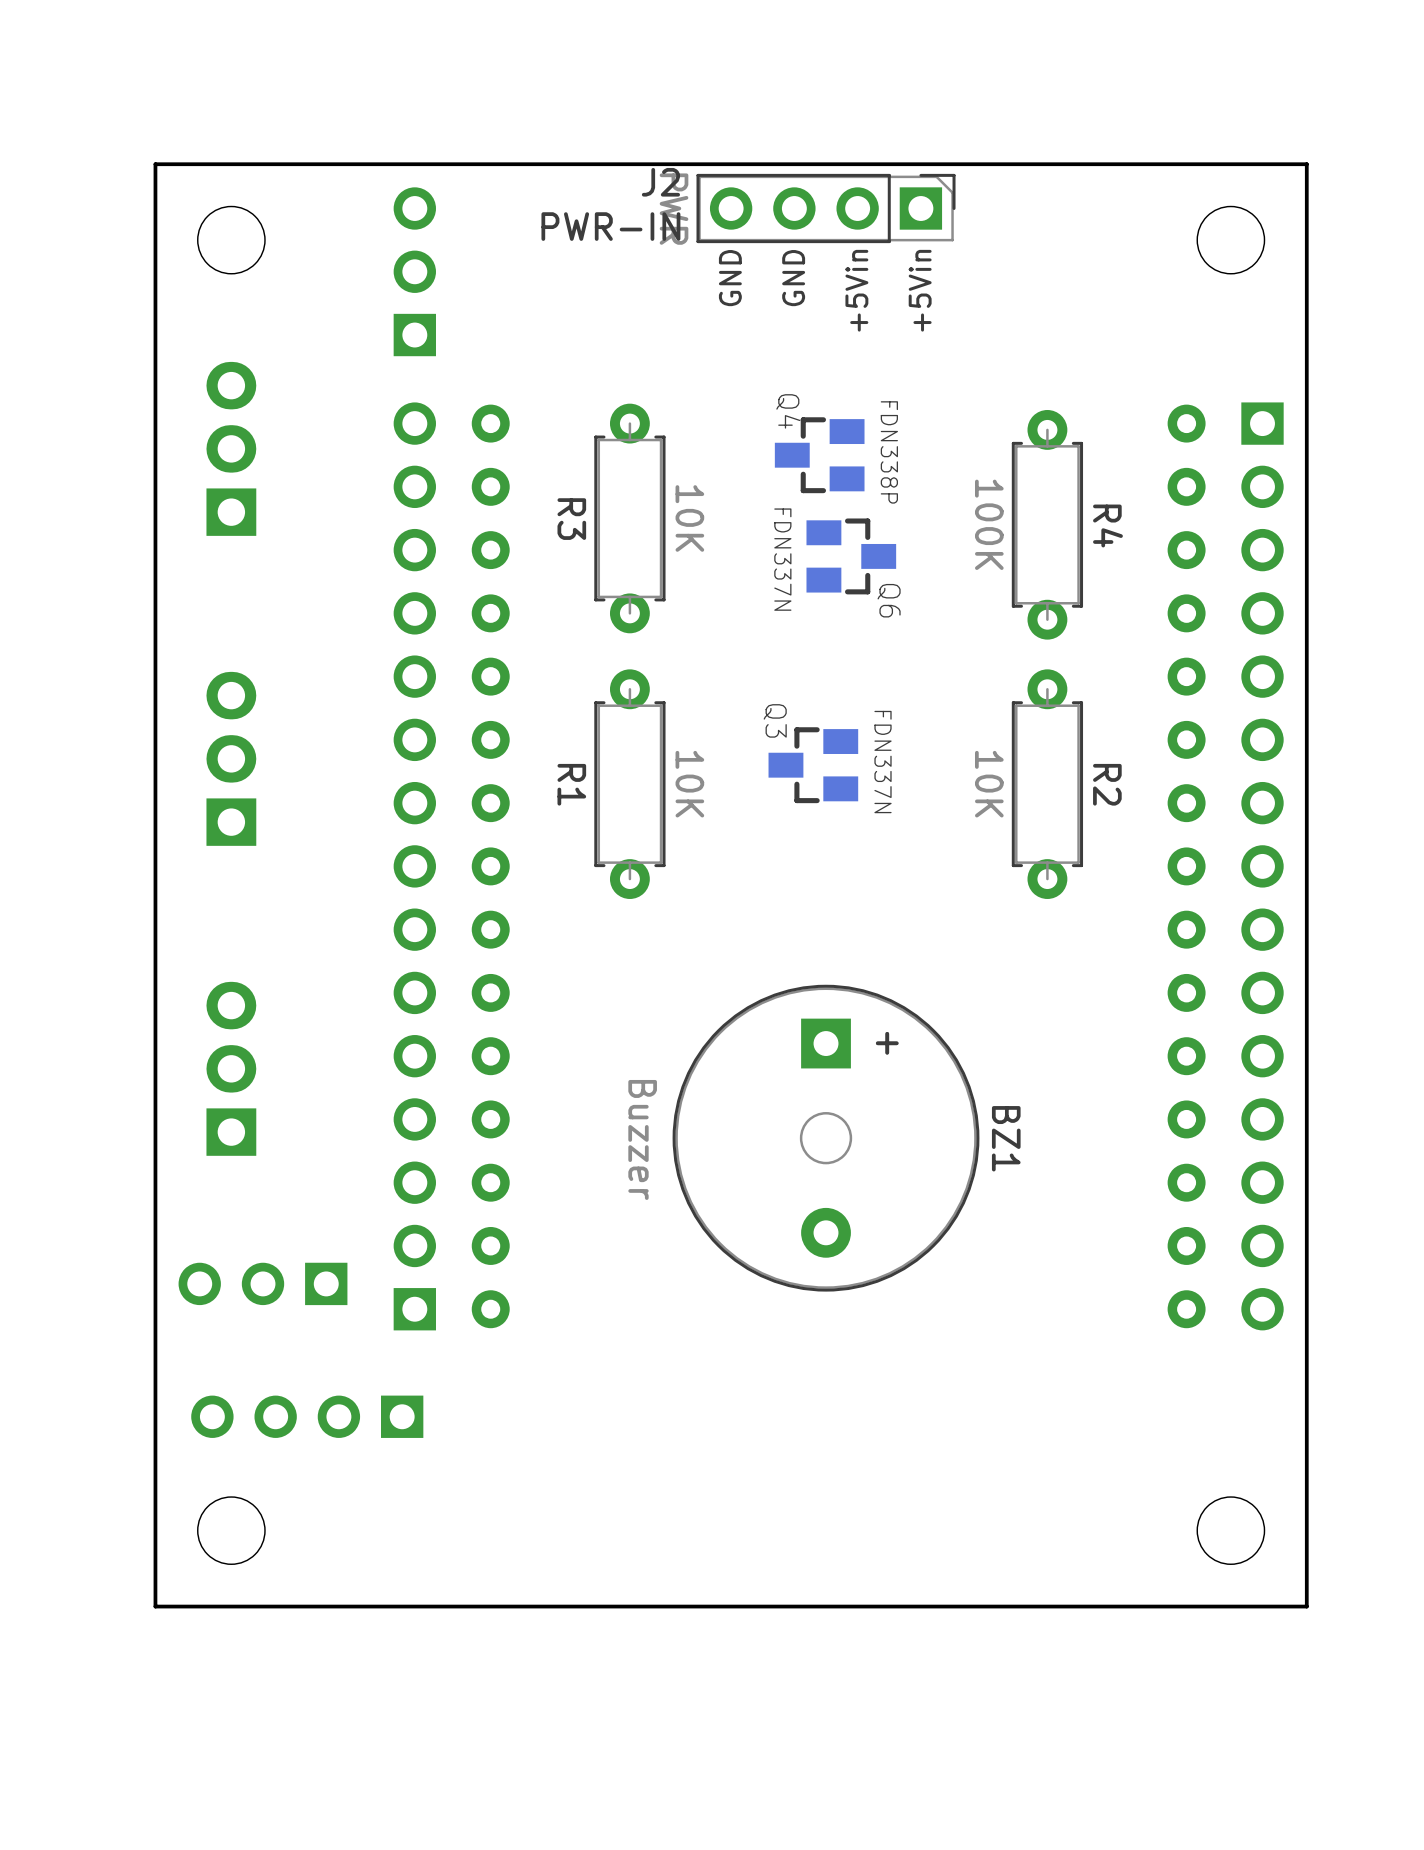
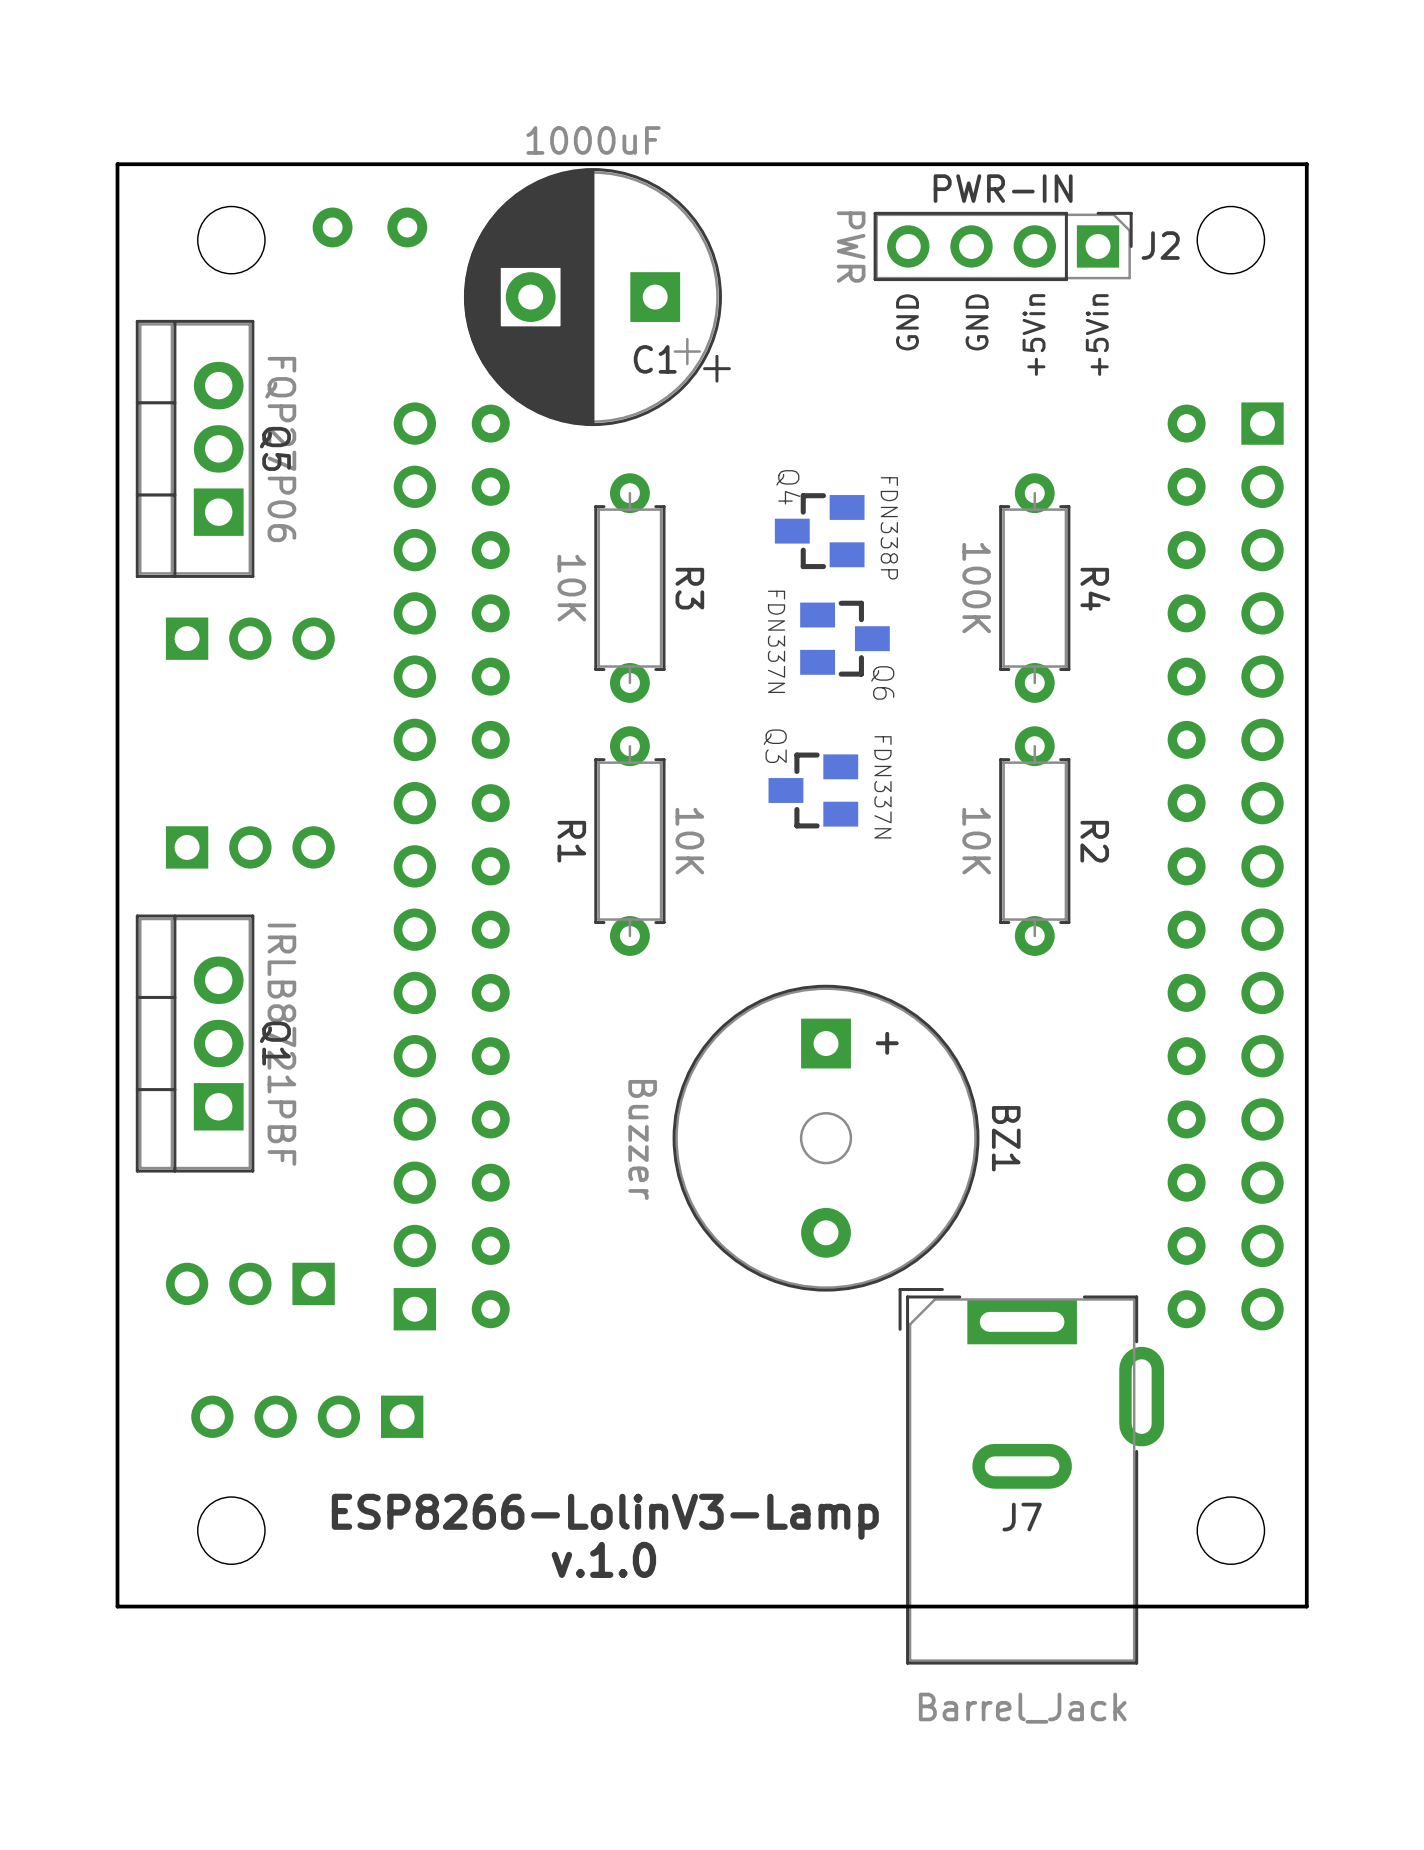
board edge: (155, 164) (155, 1606) -> (155, 164) (117, 164) (117, 1606) (155, 1606)
J2 name position: J2 (660, 182) -> J2 (1160, 245)
J2 position: (826, 208) -> (1003, 246)
text position: PWR-IN (610, 226) -> PWR-IN (1003, 188)
part: none -> (369, 227)
part: (414, 271) -> none
text: GND (730, 278) -> none
text: GND (793, 278) -> none
text: +5Vin (856, 290) -> none
text: +5Vin (920, 290) -> none
C1: none -> 1000uF (597, 297)
text: none -> GND (907, 322)
text: none -> GND (977, 322)
text: none -> +5Vin (1034, 335)
text: none -> +5Vin (1097, 335)
Q5 side: top (231, 448) -> bottom (195, 448)
Q4 position: (819, 455) -> (819, 531)
R3 position: (629, 518) -> (629, 588)
R3 value position: 10K (689, 518) -> 10K (571, 588)
R3 name position: R3 (571, 519) -> R3 (689, 588)
R4 position: (1047, 524) -> (1034, 588)
Q6 position: (851, 556) -> (844, 638)
part: none -> (250, 638)
Q1 side: top (231, 758) -> bottom (195, 1043)
Q3 position: (813, 765) -> (813, 790)
R1 position: (629, 784) -> (629, 841)
R2 position: (1047, 784) -> (1034, 841)
part: none -> (250, 847)
part: (231, 1068) -> none
part position: (263, 1283) -> (250, 1283)
J7: none -> Barrel_Jack (1031, 1476)
text: none -> ESP8266-LolinV3-Lamp (605, 1516)
text: none -> v.1.0 (603, 1559)

